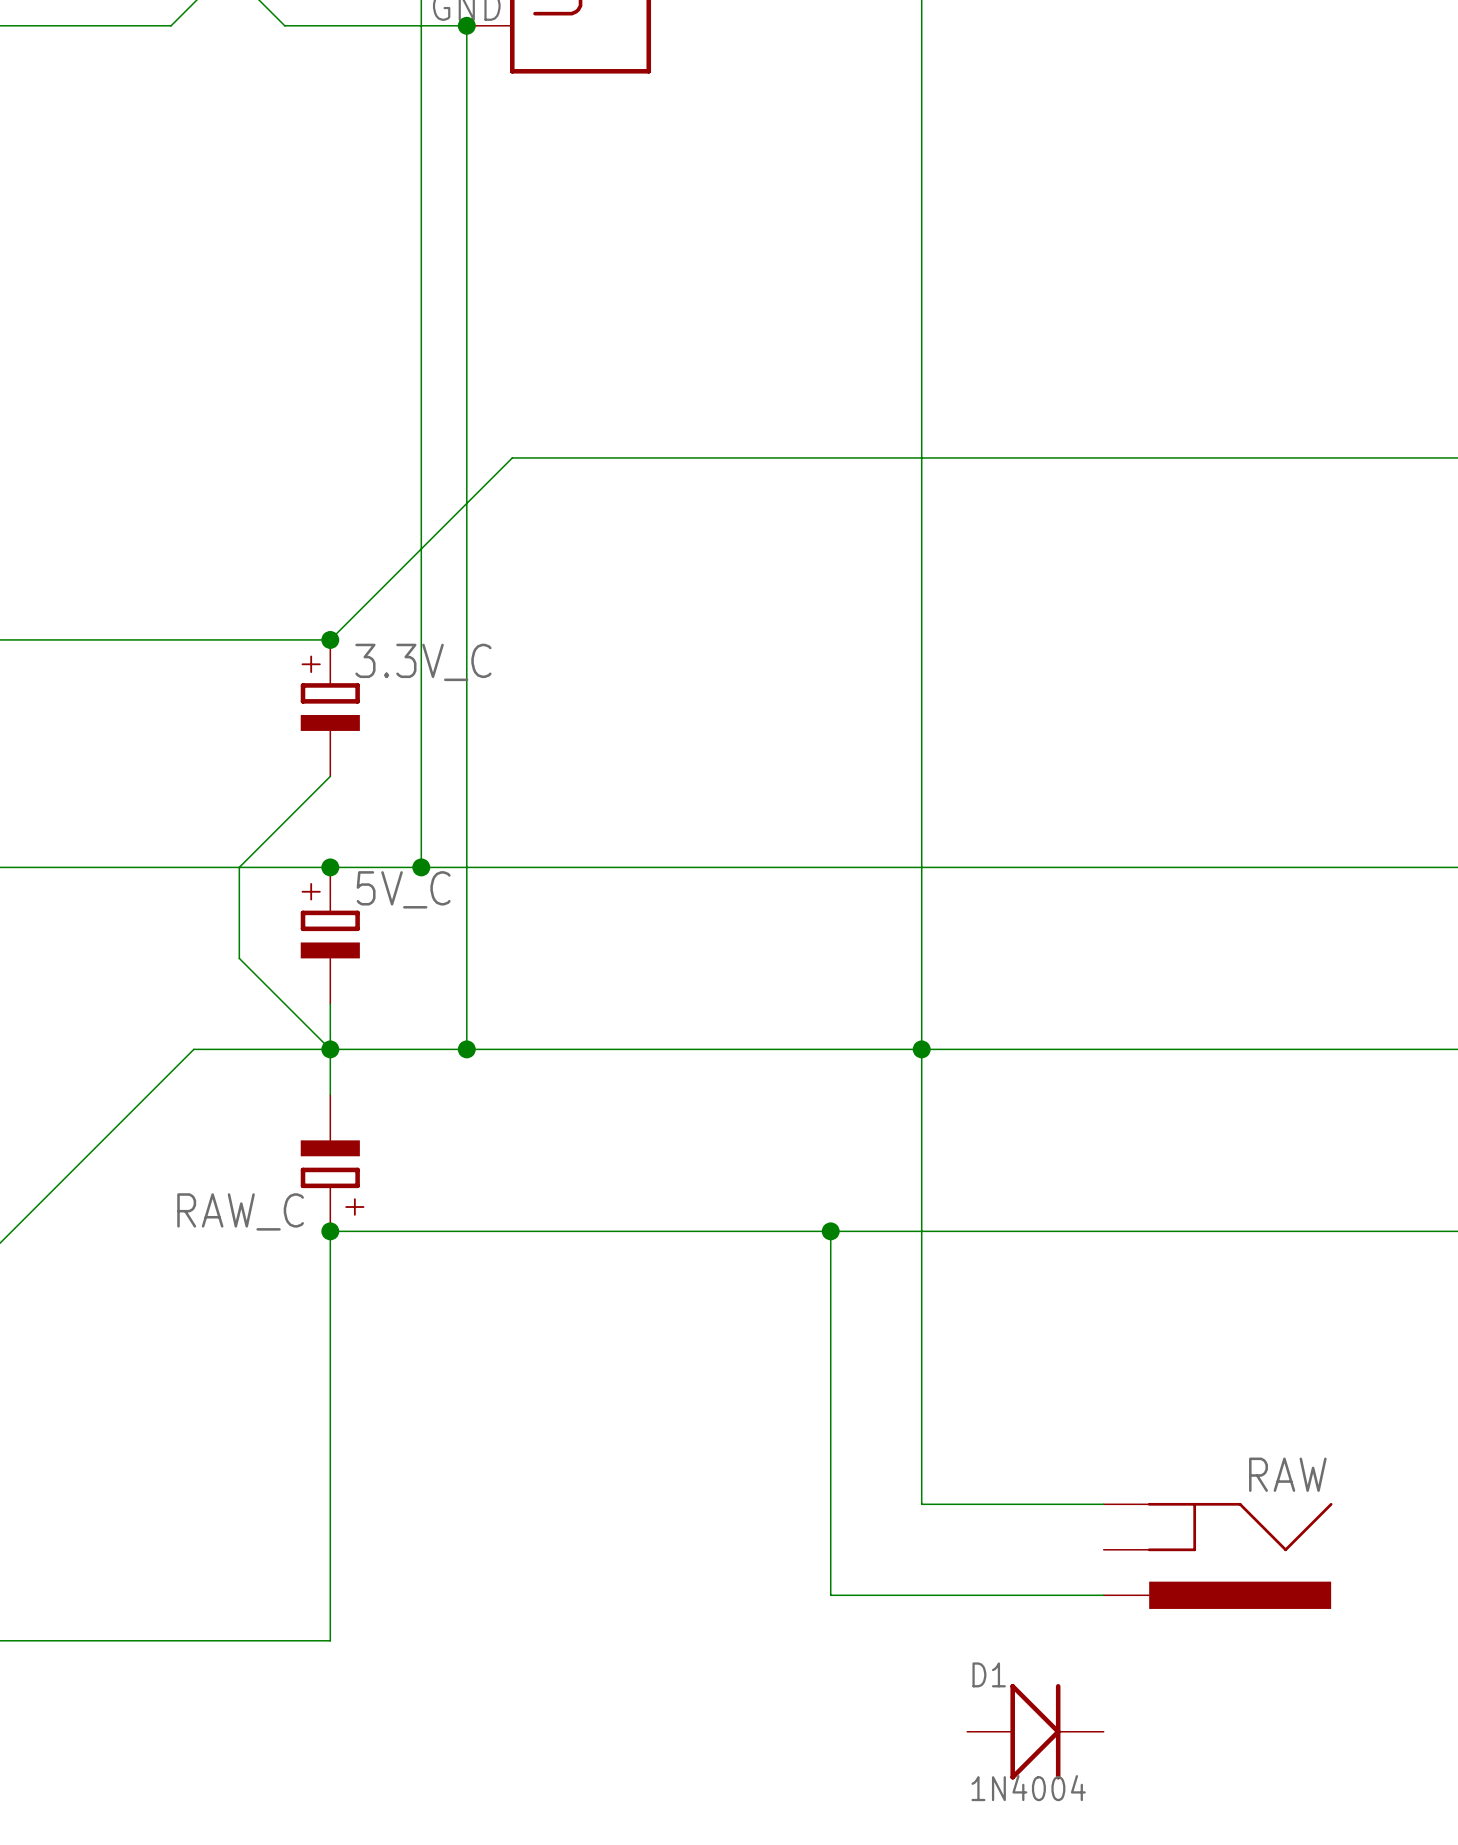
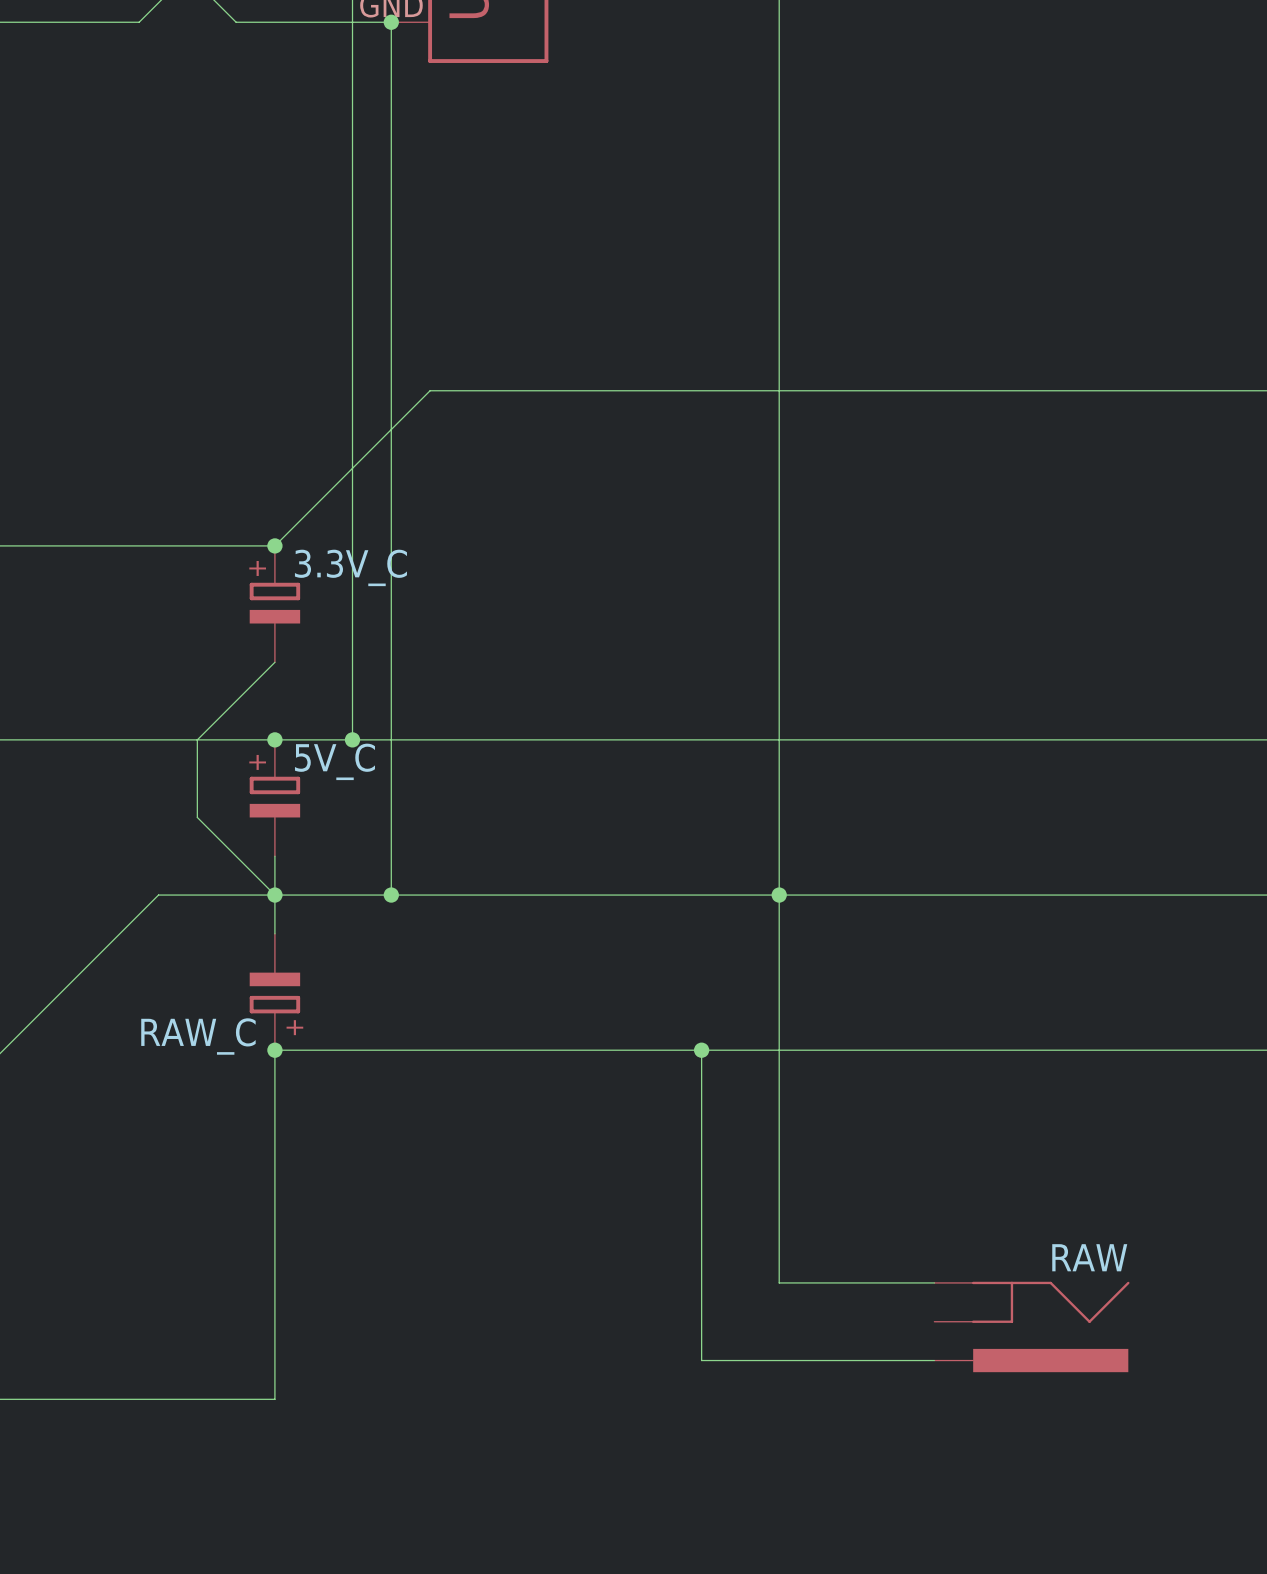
D1: 1N4004 (1035, 1731) -> none

